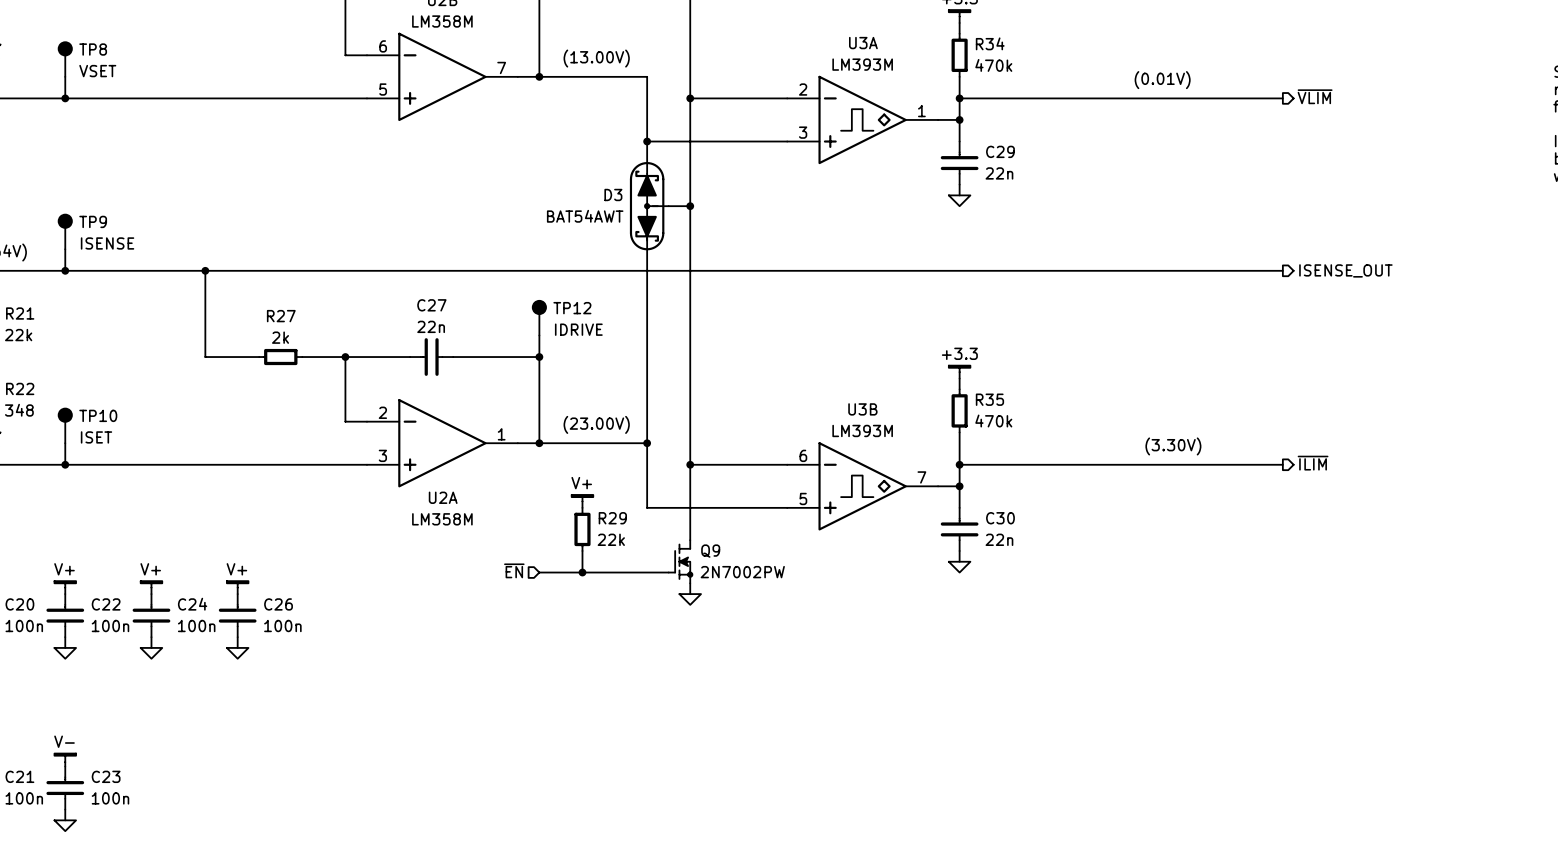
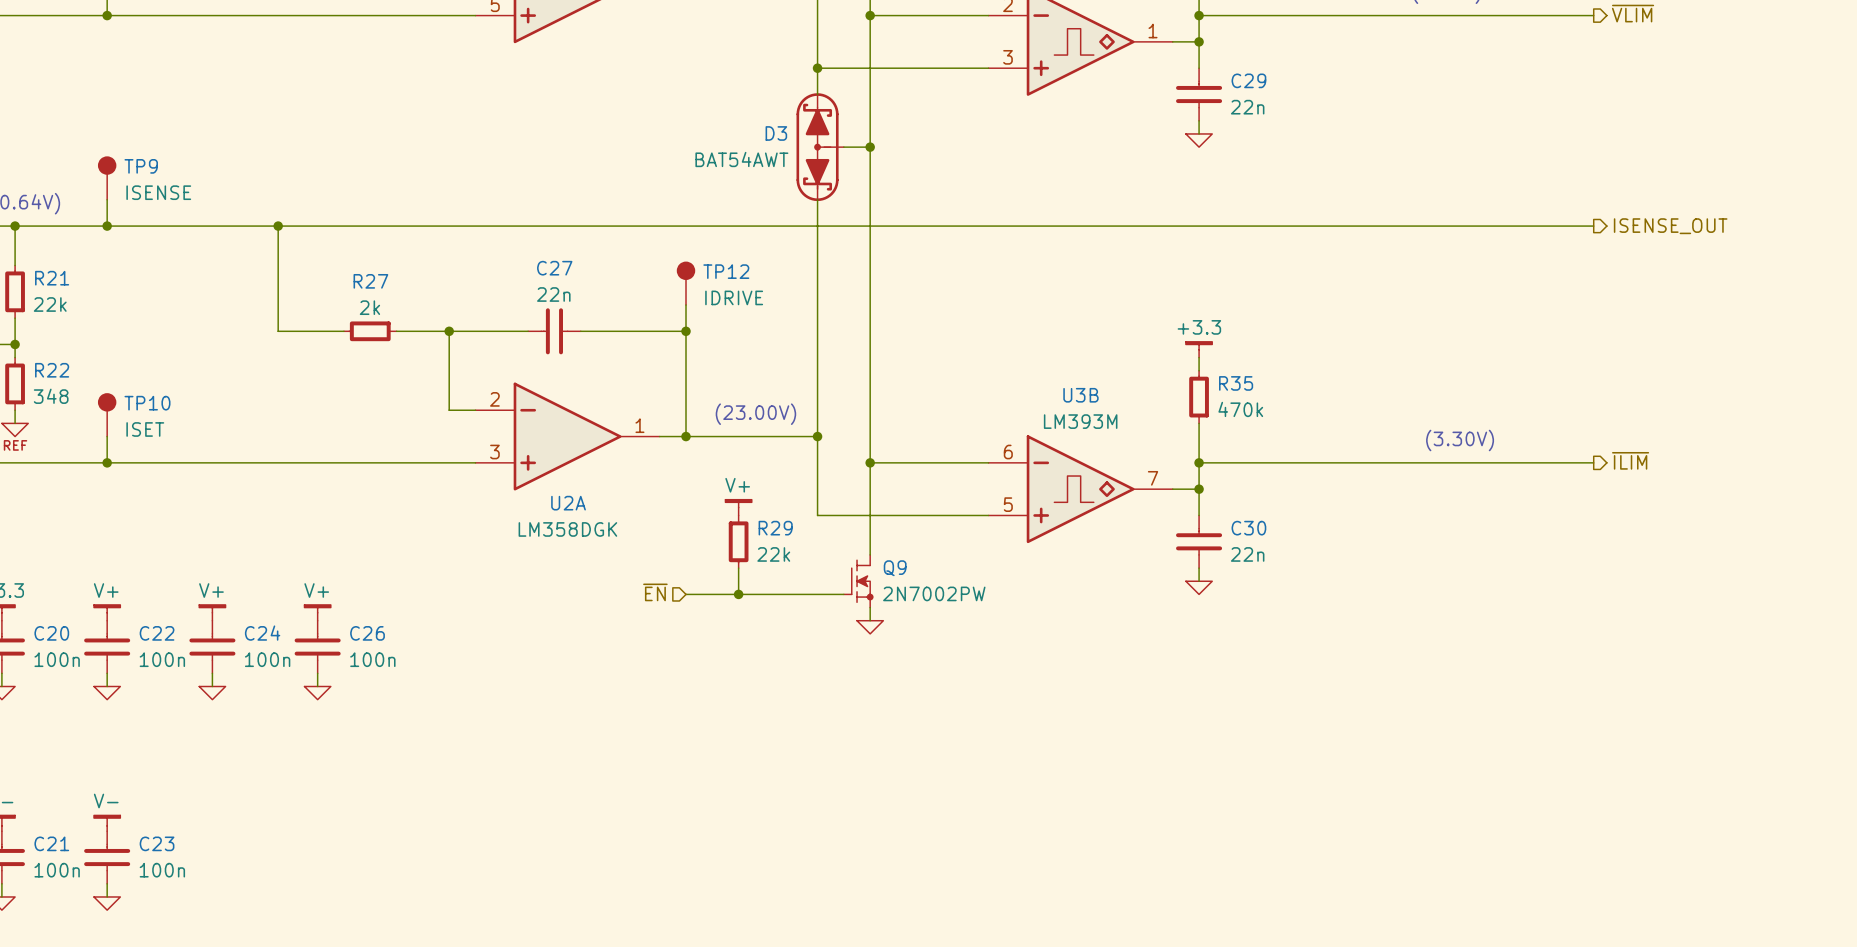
U2A value: LM358M (442, 519) -> LM358DGK (567, 529)

